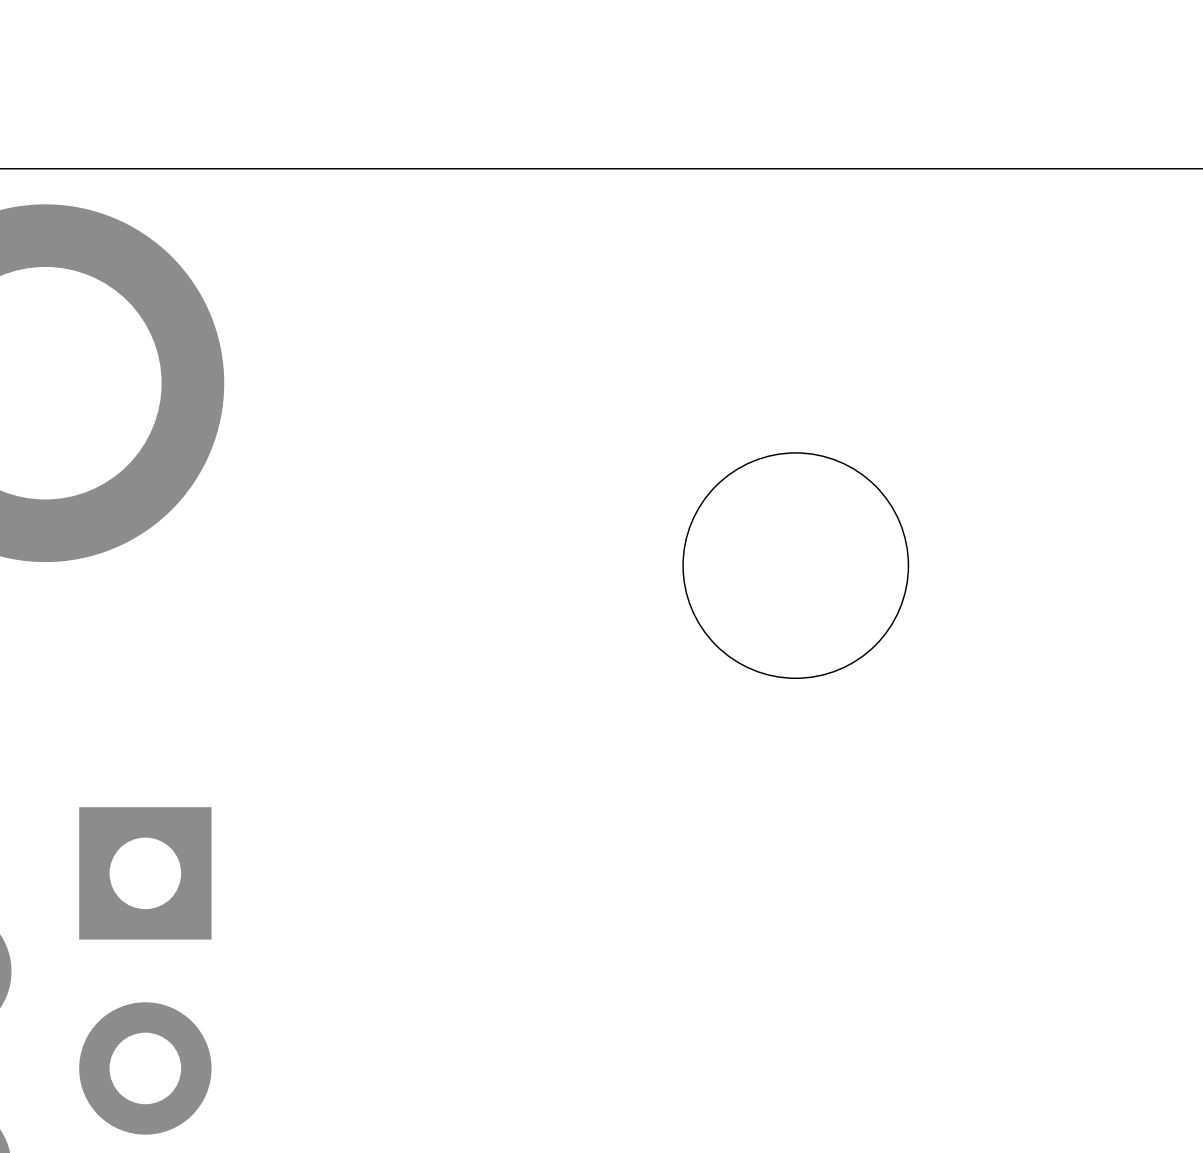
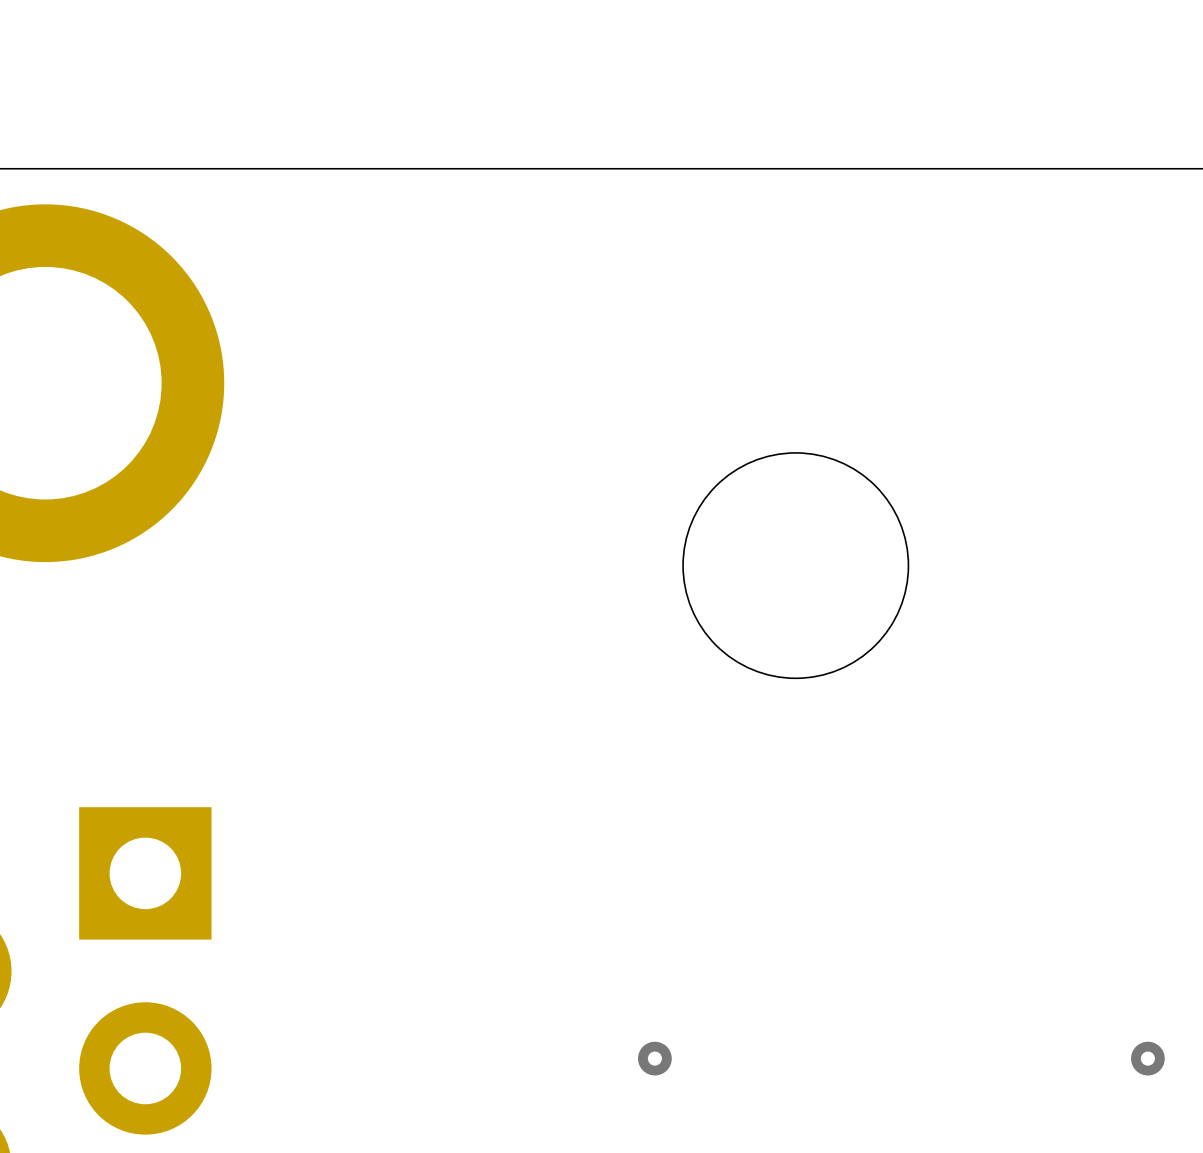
via: none -> (654, 1058)
via: none -> (1147, 1058)

